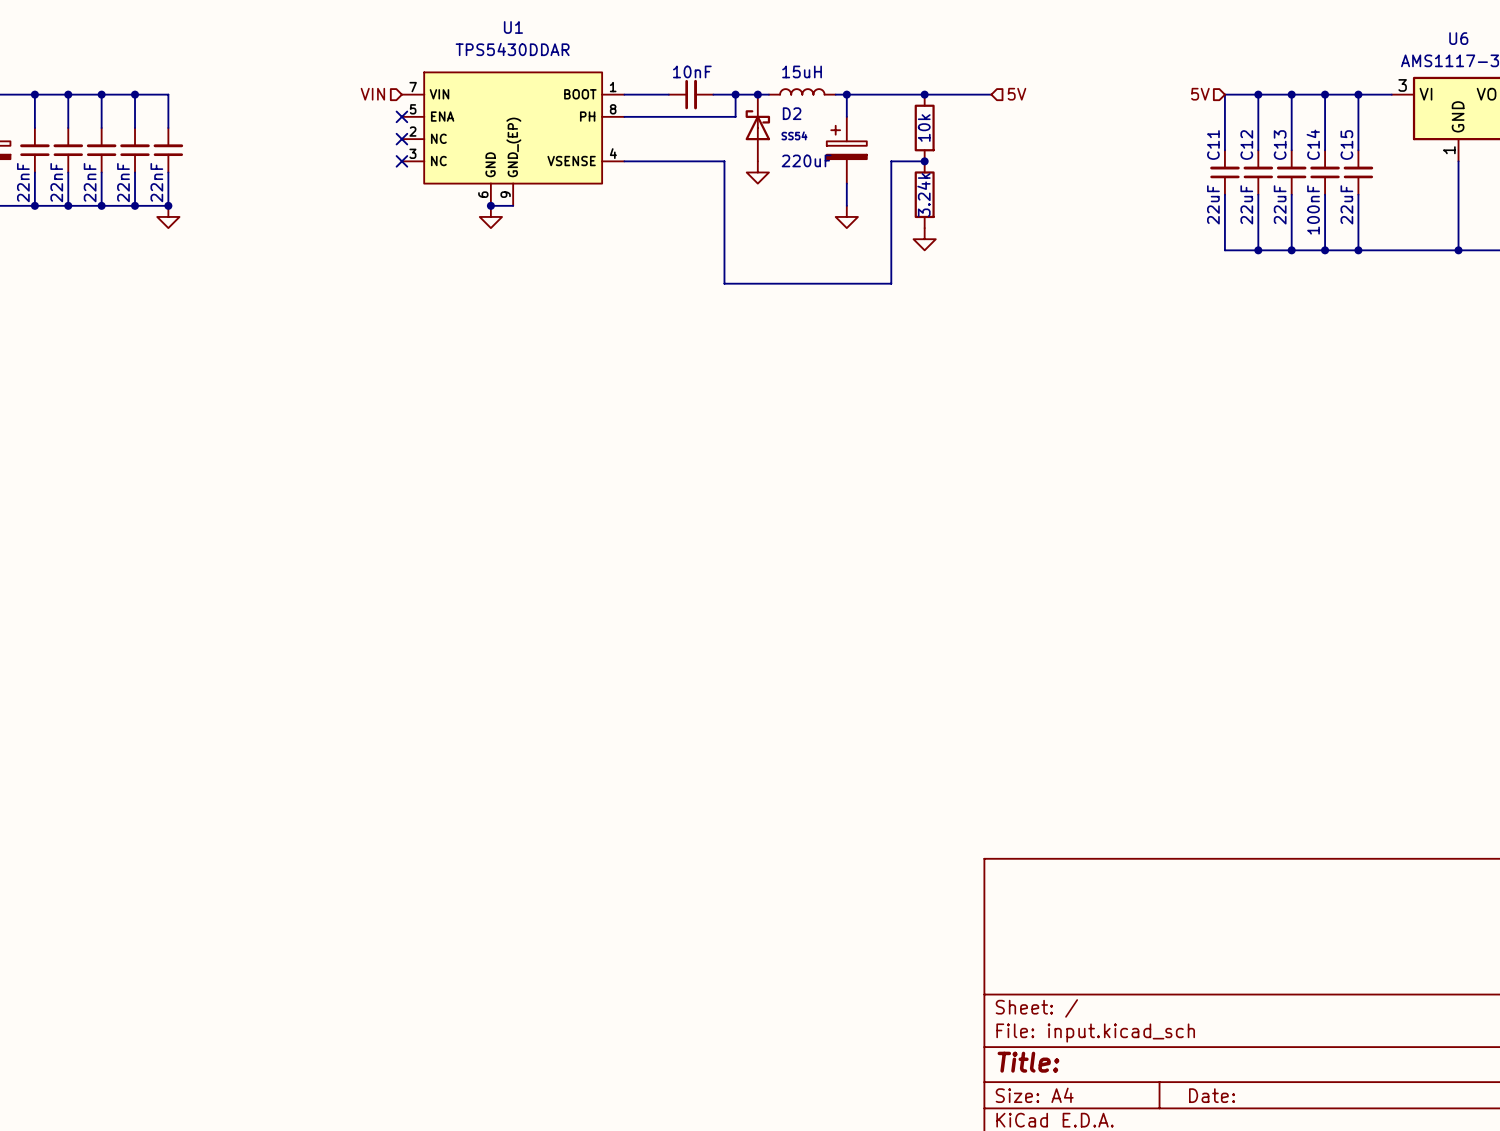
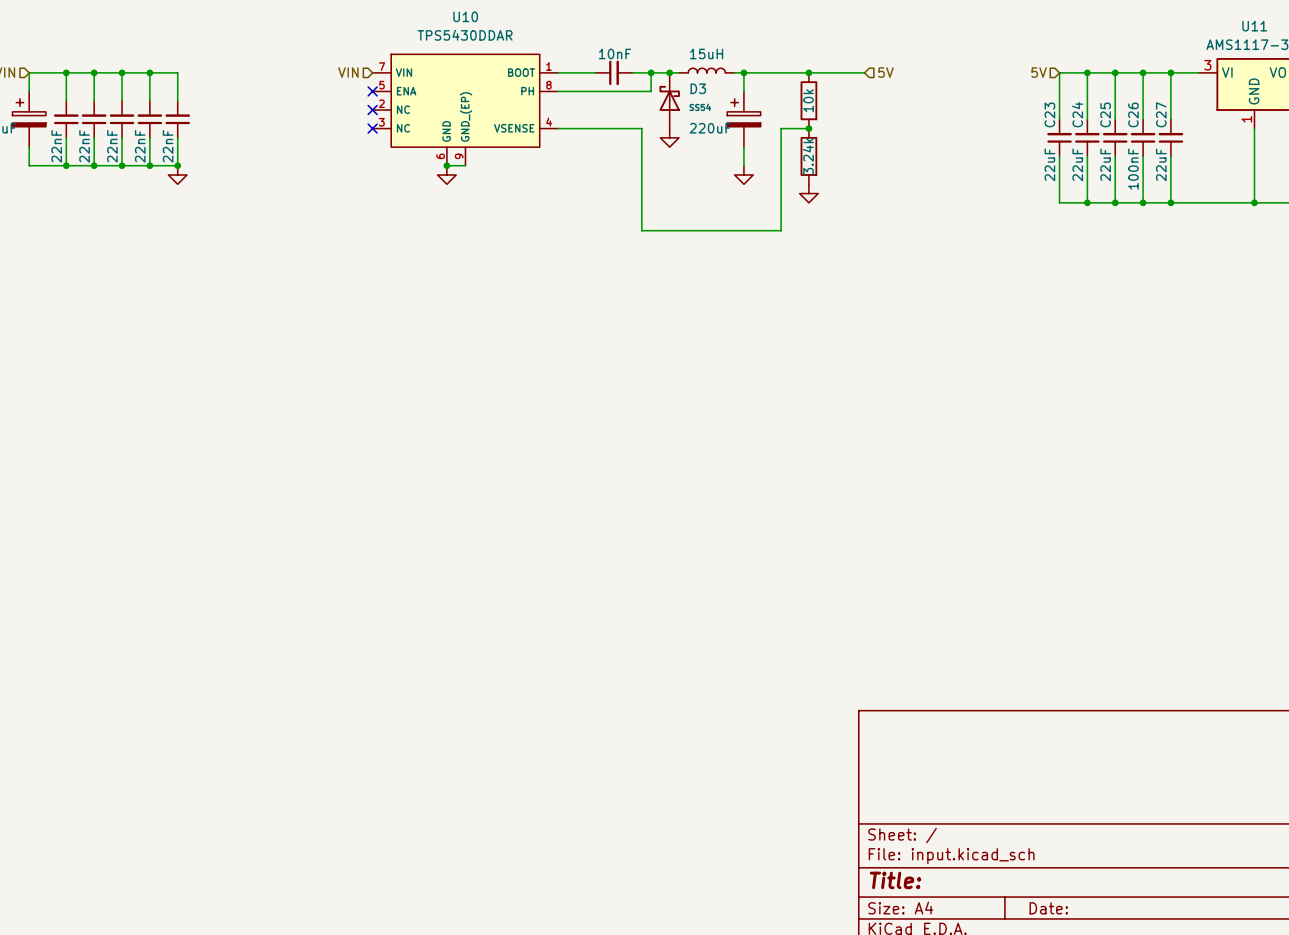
U1 name: U1 (513, 27) -> U10 (465, 16)
U6 name: U6 (1458, 38) -> U11 (1254, 26)
D2 name: D2 (792, 113) -> D3 (698, 88)
C14 name: C14 (1313, 144) -> C26 (1133, 114)
C11 name: C11 (1213, 145) -> C23 (1049, 114)
C12 name: C12 (1246, 145) -> C24 (1077, 114)
C13 name: C13 (1280, 145) -> C25 (1105, 114)
C15 name: C15 (1346, 145) -> C27 (1161, 114)

